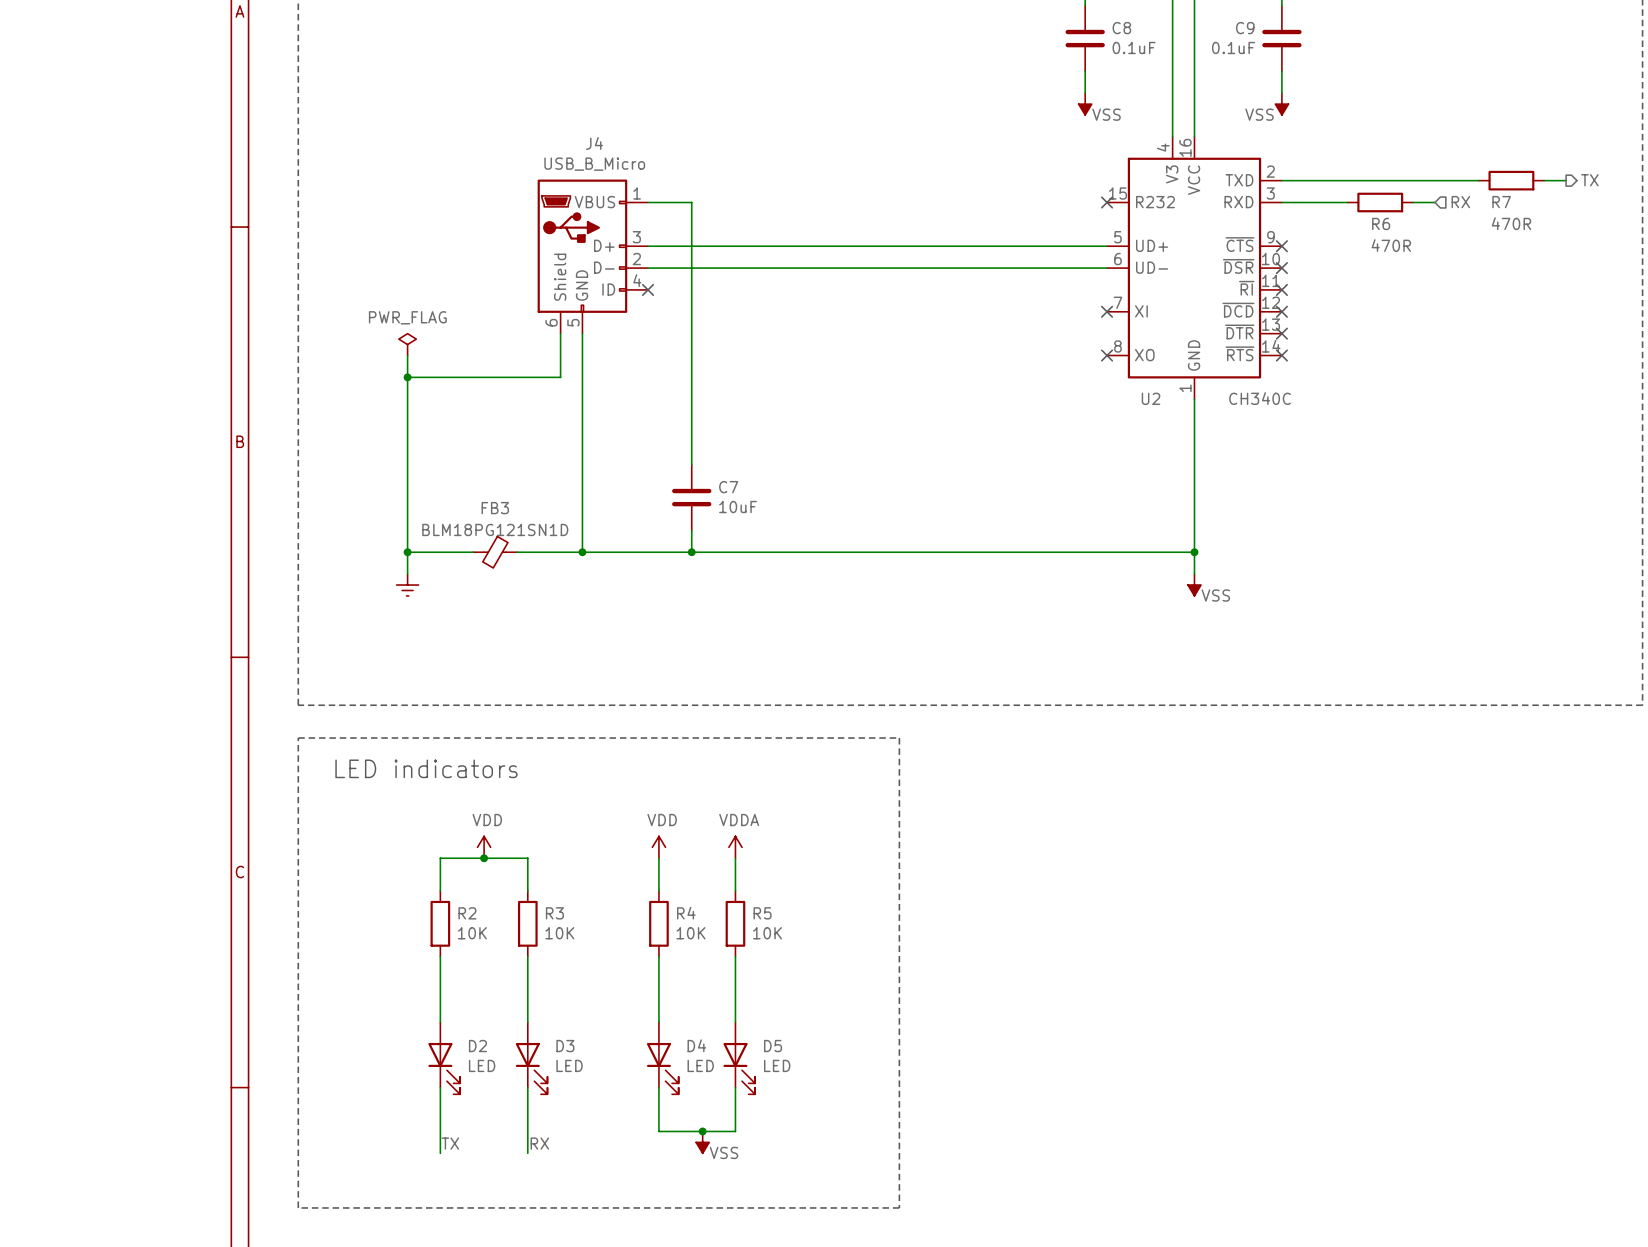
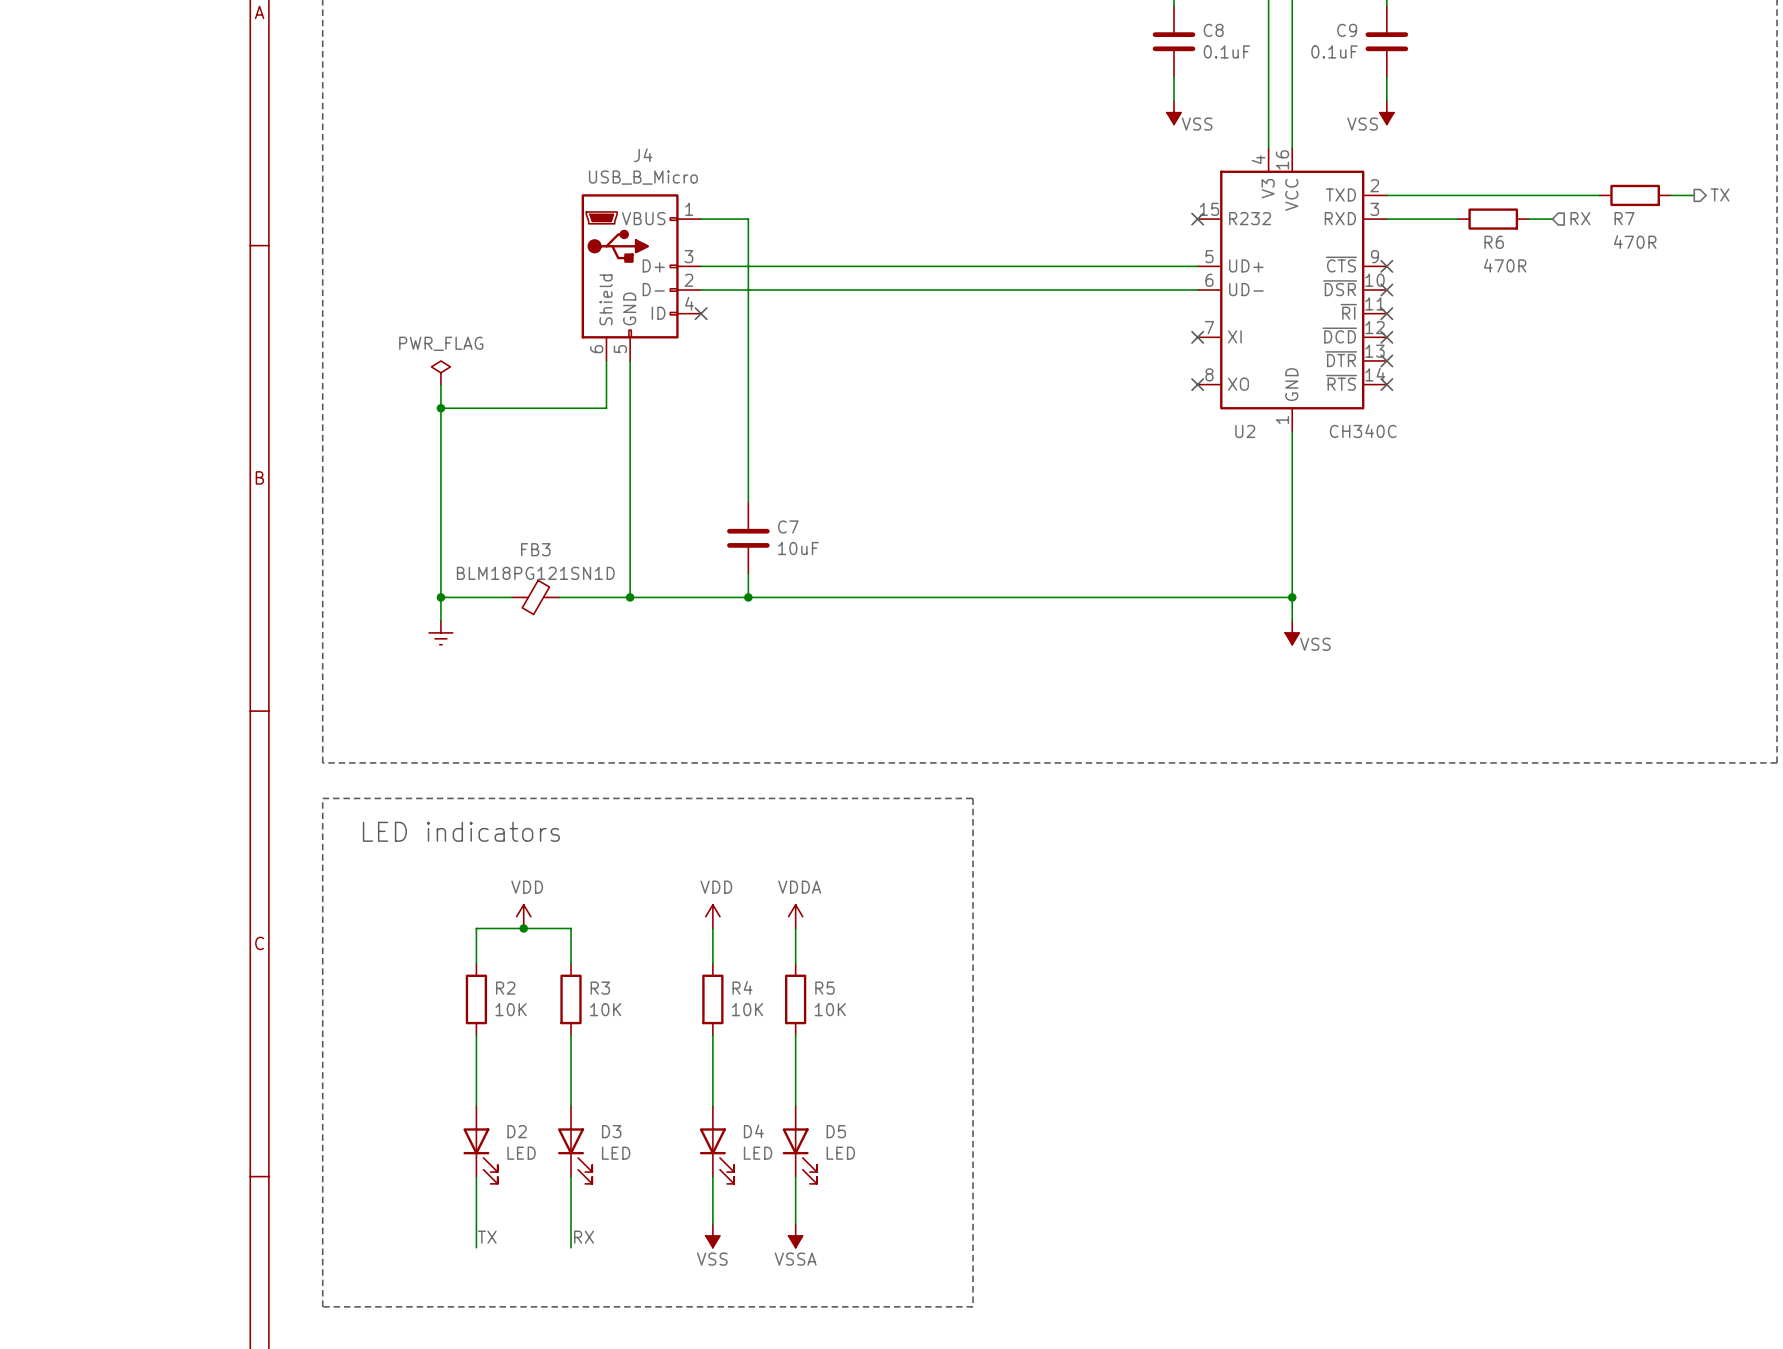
wire: (658, 1131) (735, 1131) -> none
junction: (702, 1131) -> none
power symbol position: VSS (702, 1142) -> VSS (712, 1235)
power symbol: none -> VSSA (795, 1235)
power symbol text position: VSS (724, 1152) -> VSS (712, 1259)

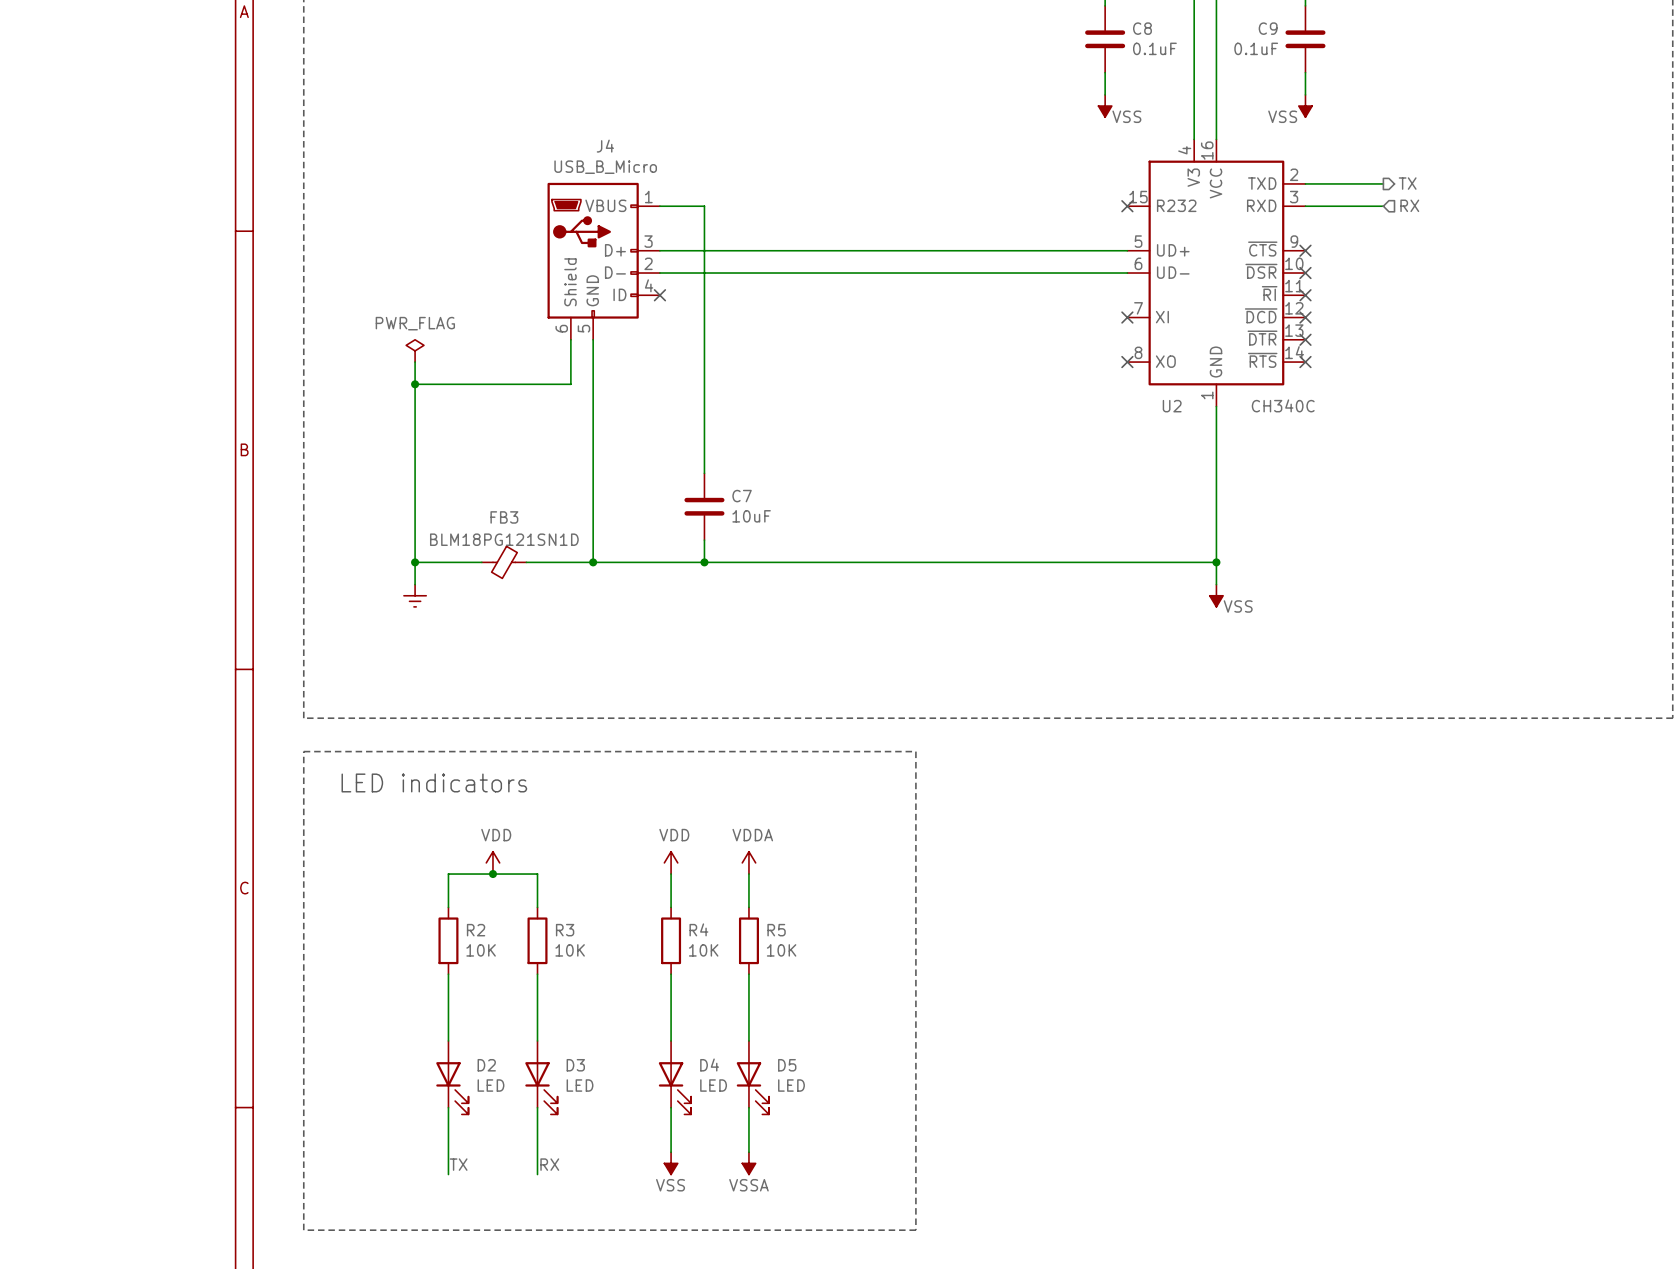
hierarchical label position: TX (1720, 194) -> TX (1407, 183)
wire: (1469, 195) (1599, 195) -> none
R7: 470R (1635, 195) -> none
wire: (1670, 195) (1694, 195) -> none
hierarchical label position: RX (1580, 218) -> RX (1409, 205)
R6: 470R (1493, 219) -> none
wire: (1528, 219) (1552, 219) -> none

